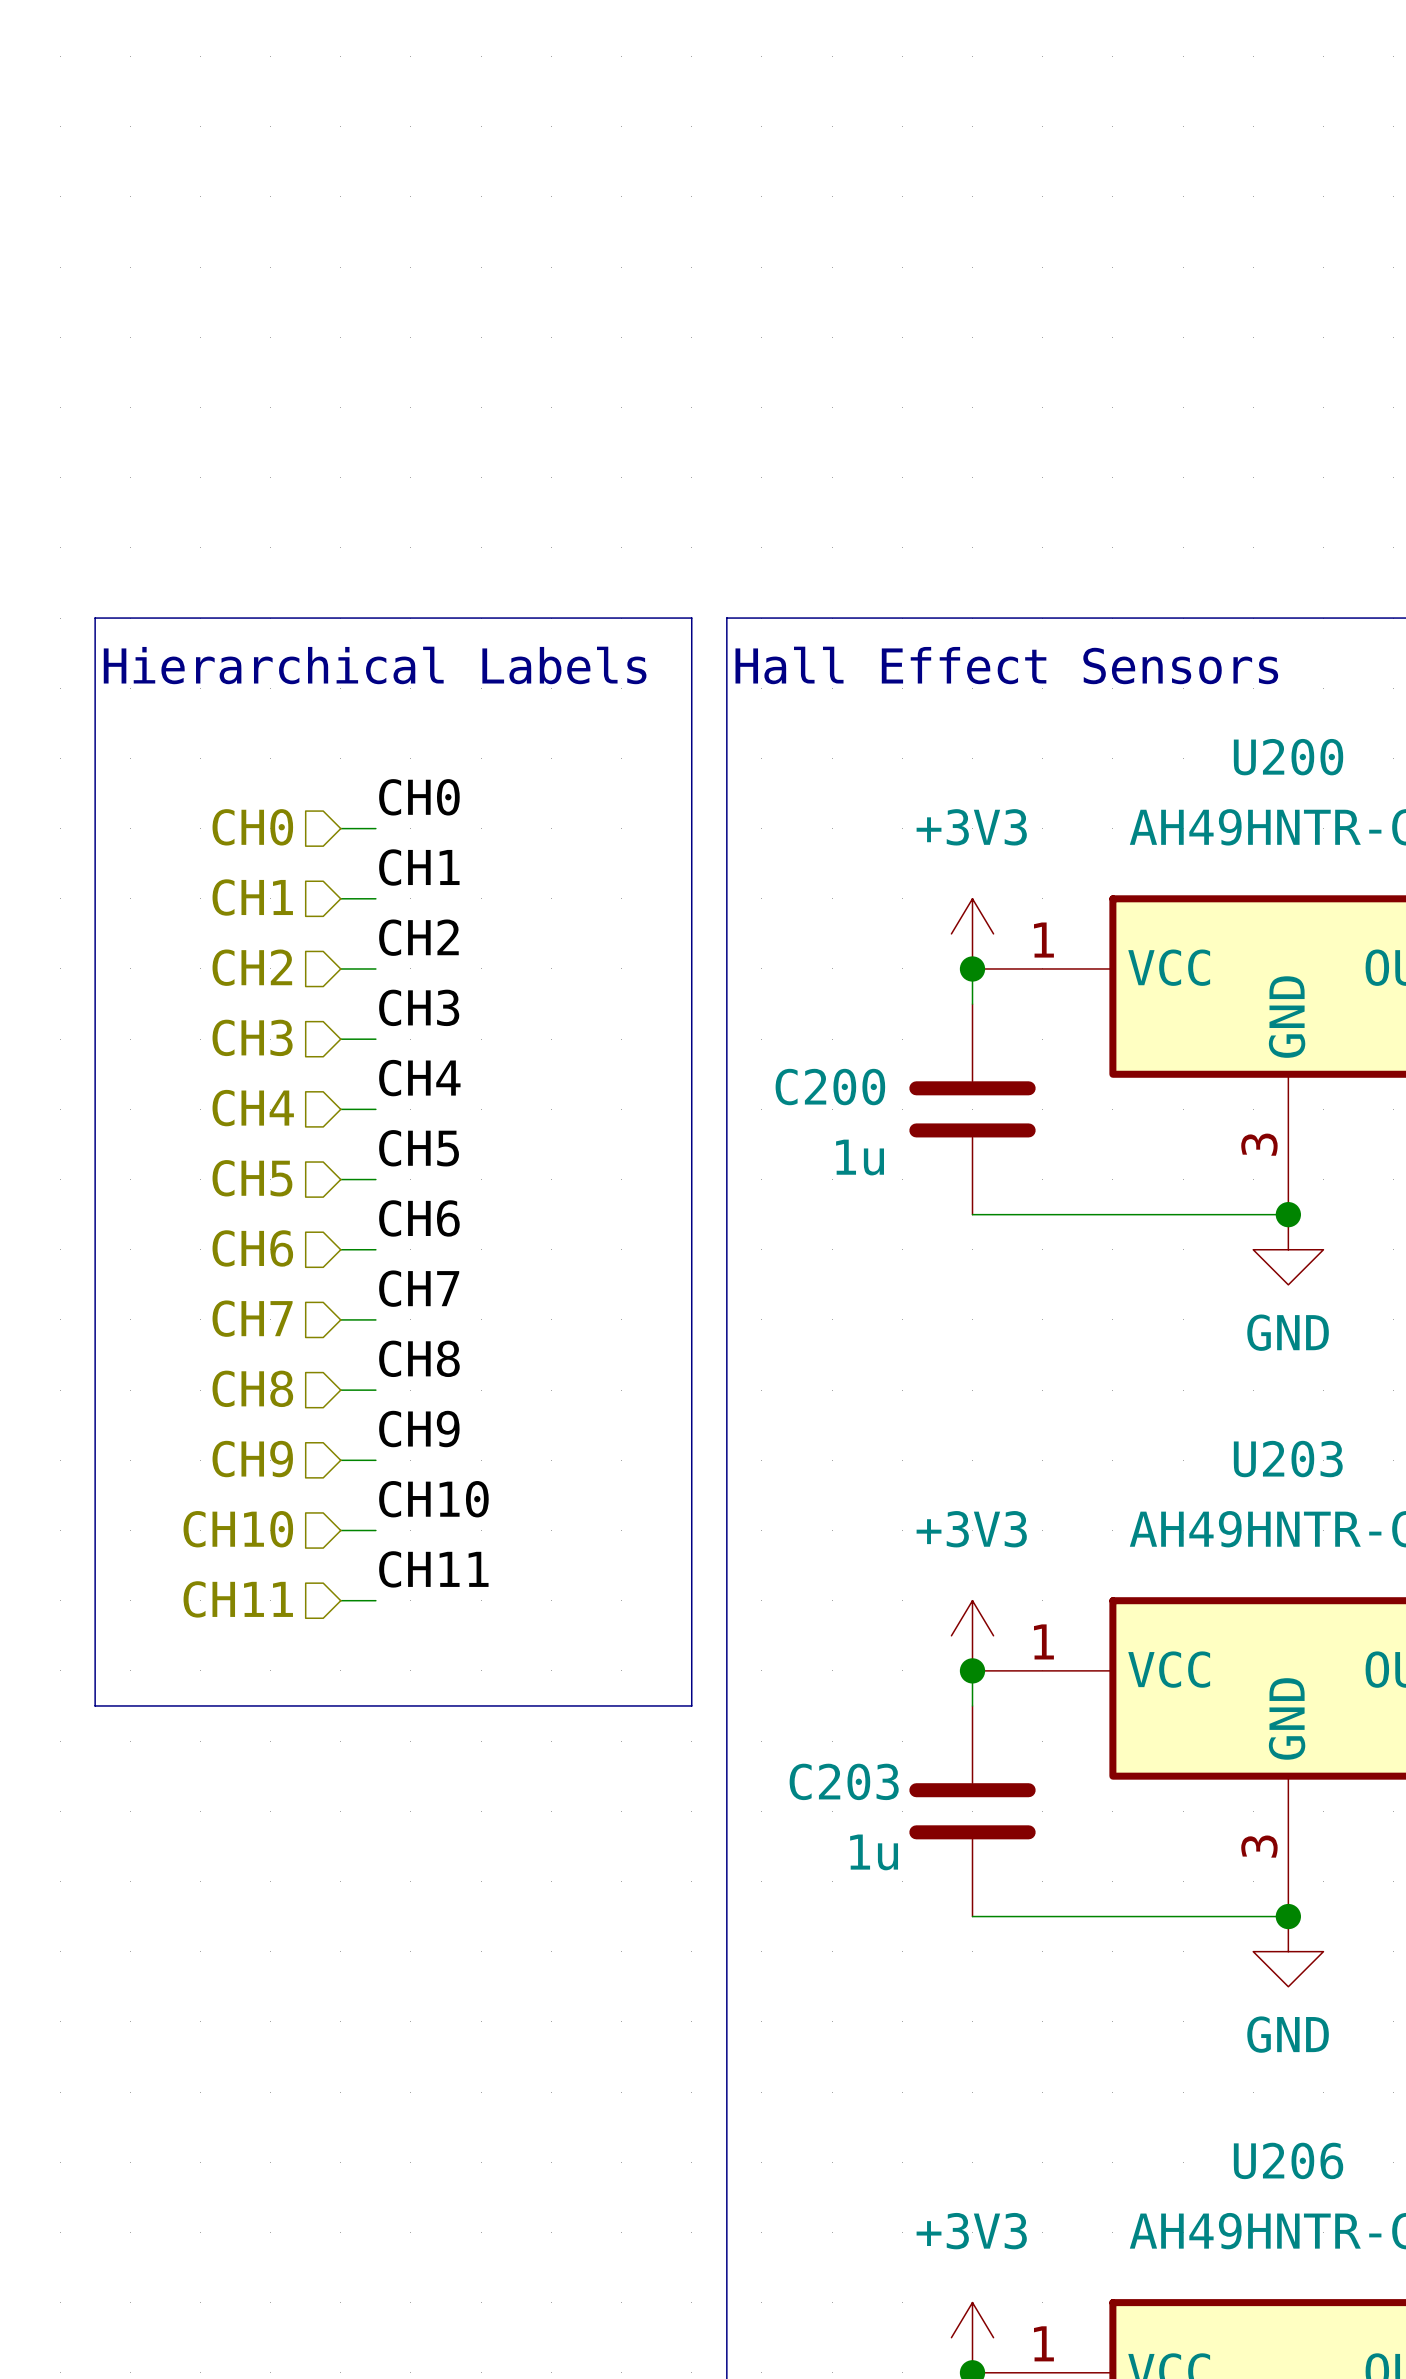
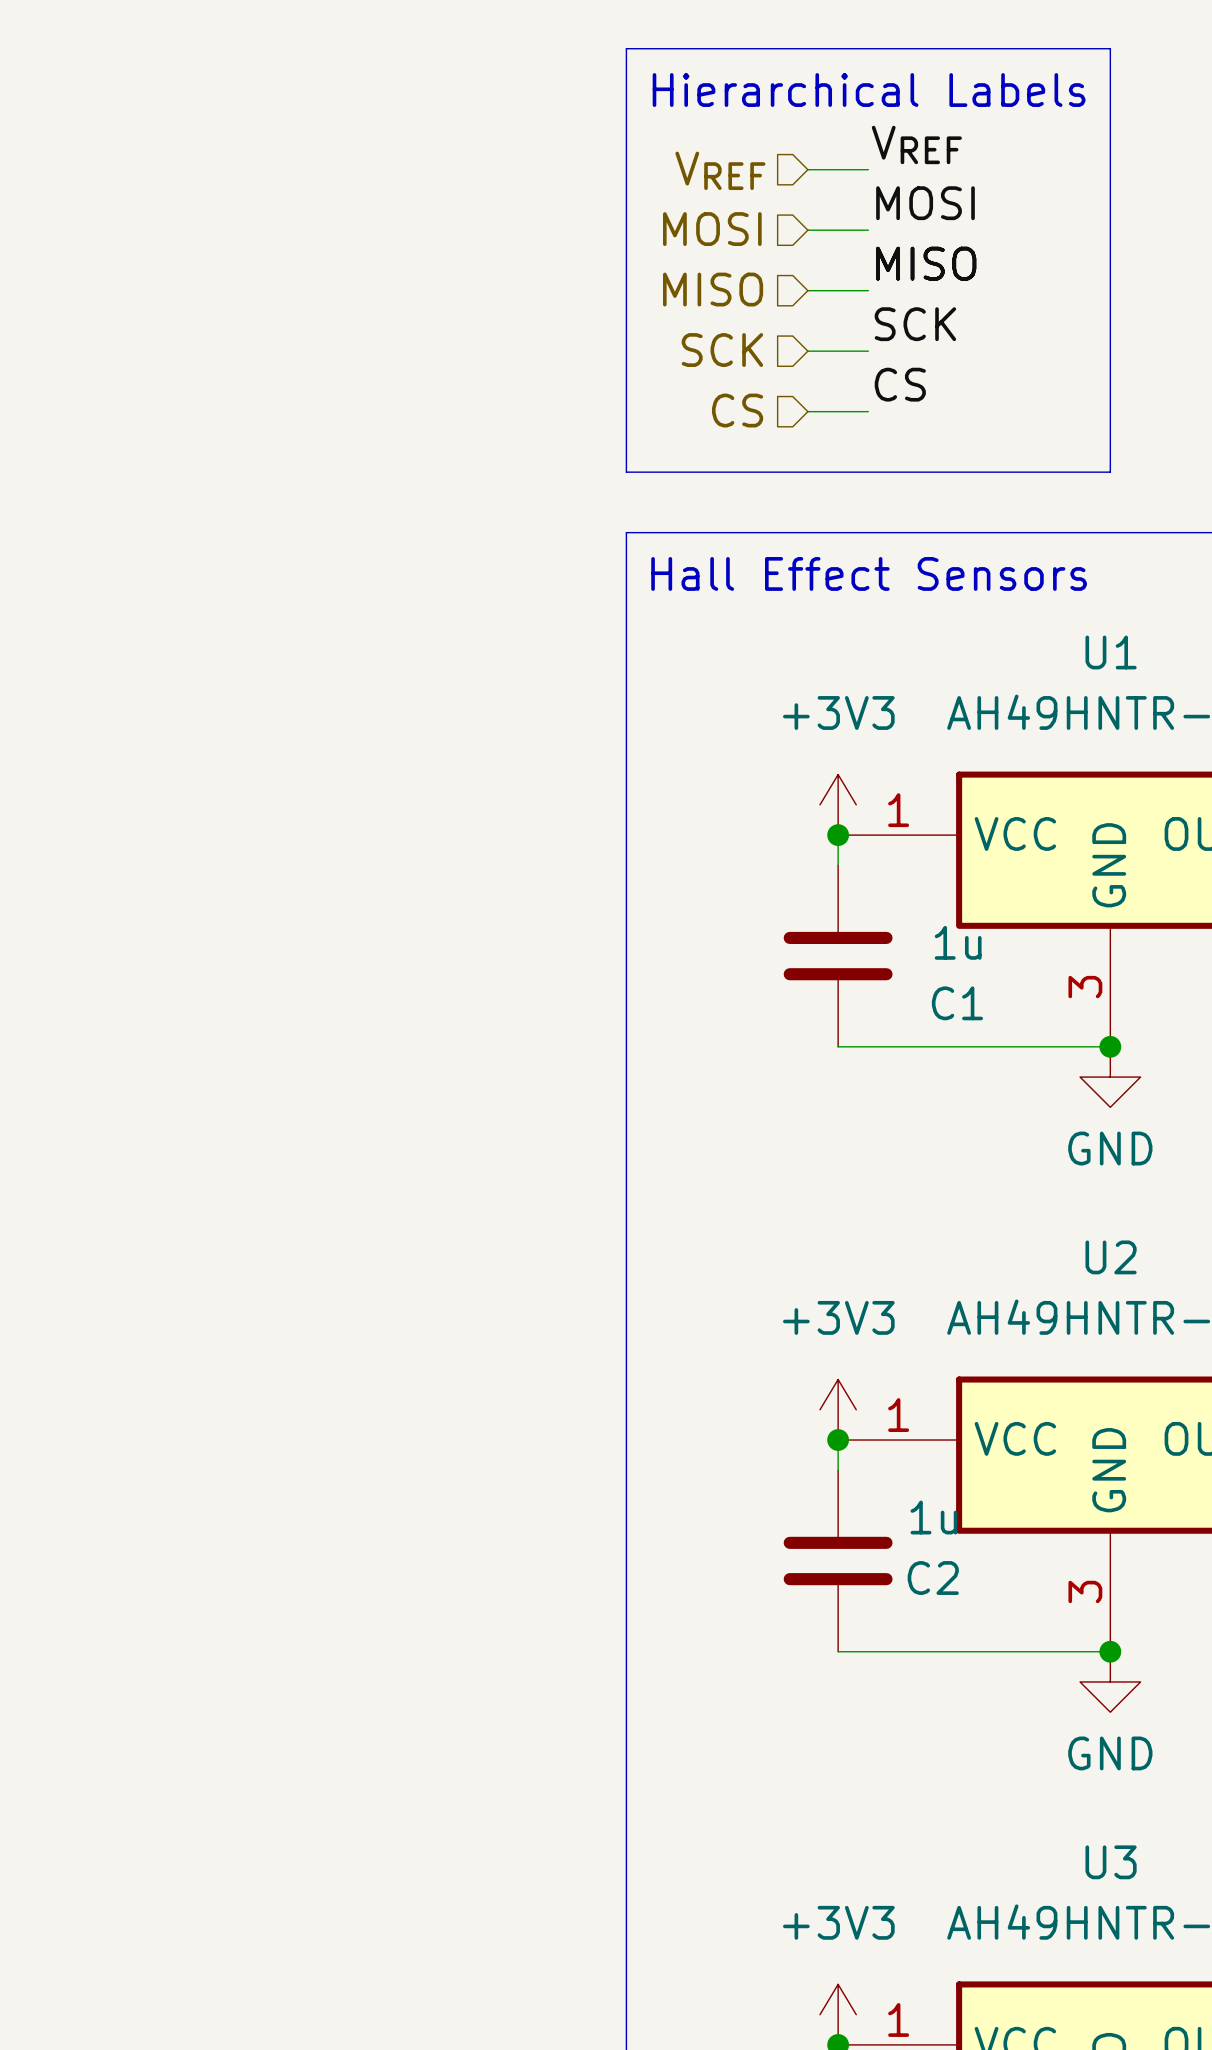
line: none -> (626, 48) (1110, 48) (1110, 472) (626, 472) (626, 48)
text: none -> Hierarchical Labels (869, 90)
label: none -> VREF (916, 144)
wire: none -> (807, 169) (868, 169)
hierarchical label: none -> VREF (720, 170)
label: none -> MOSI (925, 203)
hierarchical label: none -> MOSI (712, 229)
wire: none -> (807, 230) (868, 230)
label: none -> MISO (926, 263)
hierarchical label: none -> MISO (713, 289)
wire: none -> (807, 290) (868, 290)
label: none -> SCK (915, 324)
hierarchical label: none -> SCK (722, 350)
wire: none -> (807, 351) (868, 351)
label: none -> CS (900, 384)
hierarchical label: none -> CS (737, 410)
wire: none -> (807, 411) (868, 411)
line: (95, 618) (691, 618) (691, 1705) (95, 1705) (95, 618) -> none
text: Hierarchical Labels (375, 665) -> none
U200 name: U200 (1288, 757) -> U1 (1111, 652)
label: CH0 (419, 797) -> none
hierarchical label: CH0 (252, 827) -> none
wire: (340, 828) (375, 828) -> none
label: CH1 (419, 867) -> none
hierarchical label: CH1 (252, 897) -> none
wire: (340, 898) (375, 898) -> none
label: CH2 (418, 937) -> none
hierarchical label: CH2 (252, 967) -> none
wire: (340, 968) (375, 968) -> none
label: CH3 (419, 1007) -> none
hierarchical label: CH3 (252, 1037) -> none
wire: (340, 1039) (375, 1039) -> none
label: CH4 (419, 1078) -> none
C200 name: C200 (830, 1087) -> C1 (957, 1003)
hierarchical label: CH4 (253, 1108) -> none
wire: (340, 1109) (375, 1109) -> none
label: CH5 (419, 1148) -> none
C200 value position: 1u (860, 1157) -> 1u (958, 942)
hierarchical label: CH5 (252, 1178) -> none
wire: (340, 1179) (375, 1179) -> none
label: CH6 (419, 1218) -> none
hierarchical label: CH6 (252, 1248) -> none
wire: (340, 1249) (375, 1249) -> none
label: CH7 (419, 1288) -> none
hierarchical label: CH7 (252, 1318) -> none
wire: (340, 1319) (375, 1319) -> none
label: CH8 (419, 1358) -> none
hierarchical label: CH8 (252, 1388) -> none
wire: (340, 1390) (375, 1390) -> none
label: CH9 (419, 1429) -> none
hierarchical label: CH9 (252, 1459) -> none
U203 name: U203 (1288, 1459) -> U2 (1111, 1257)
wire: (340, 1460) (375, 1460) -> none
label: CH10 (433, 1499) -> none
hierarchical label: CH10 (238, 1529) -> none
wire: (340, 1530) (375, 1530) -> none
label: CH11 (433, 1569) -> none
hierarchical label: CH11 (238, 1599) -> none
wire: (340, 1600) (375, 1600) -> none
C203 name: C203 (844, 1781) -> C2 (933, 1578)
C203 value position: 1u (874, 1852) -> 1u (933, 1517)
U206 name: U206 (1288, 2160) -> U3 (1111, 1862)

